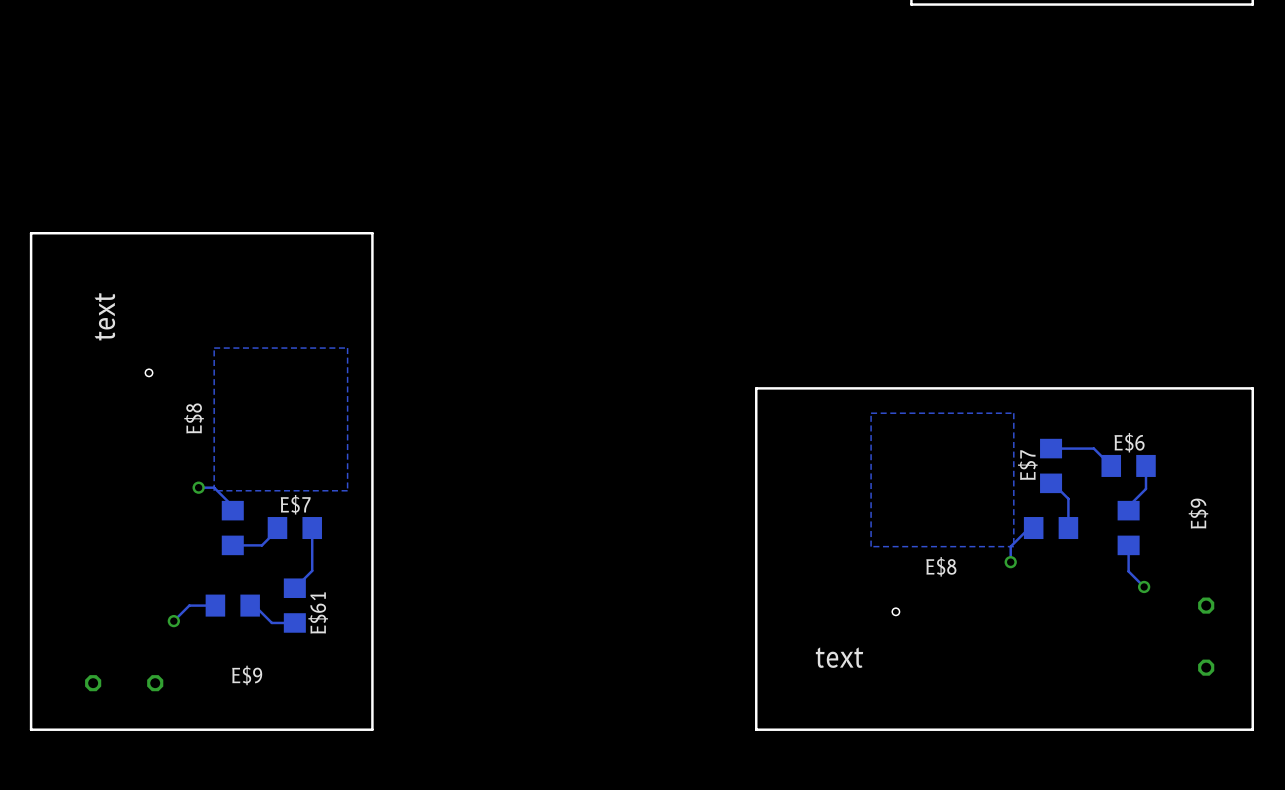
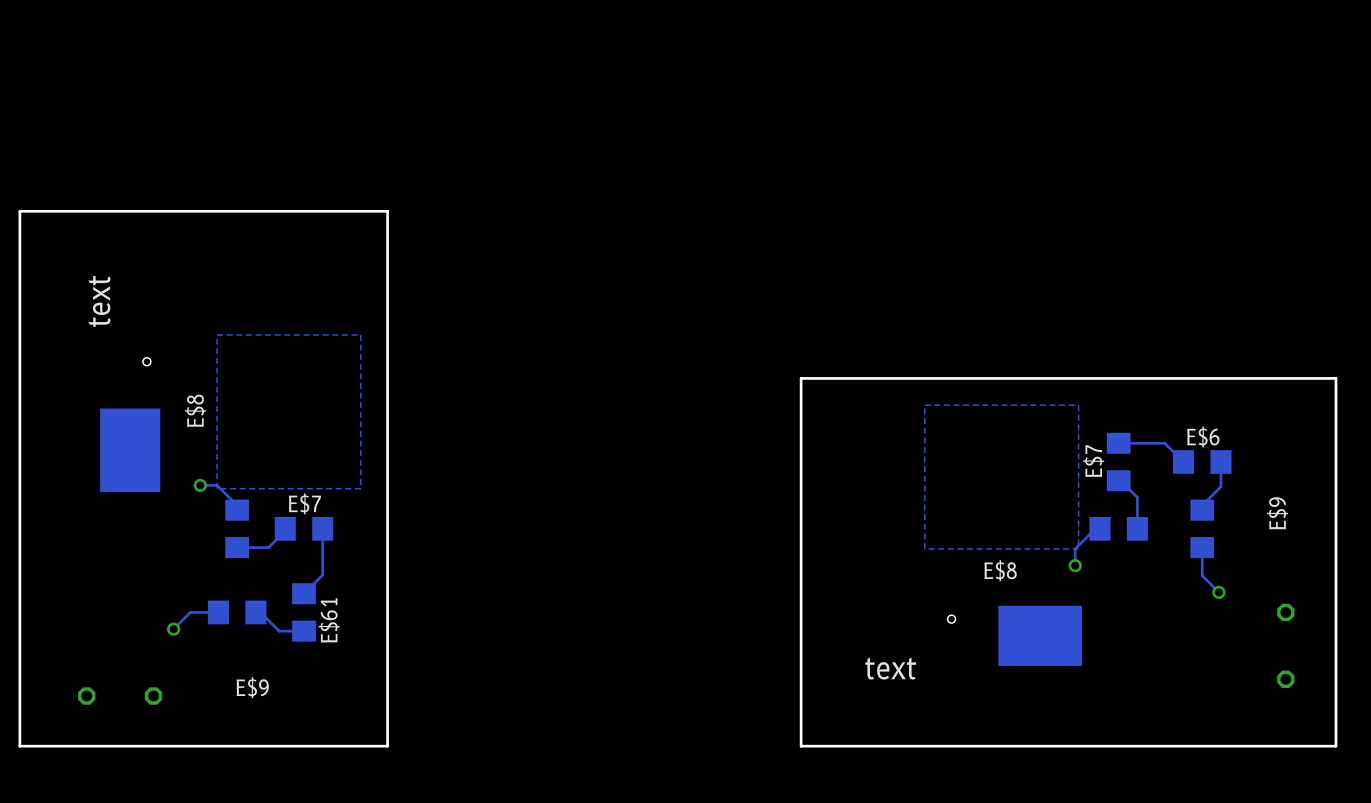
drawing: none -> [100, 408, 161, 493]
drawing: none -> [998, 605, 1082, 666]

